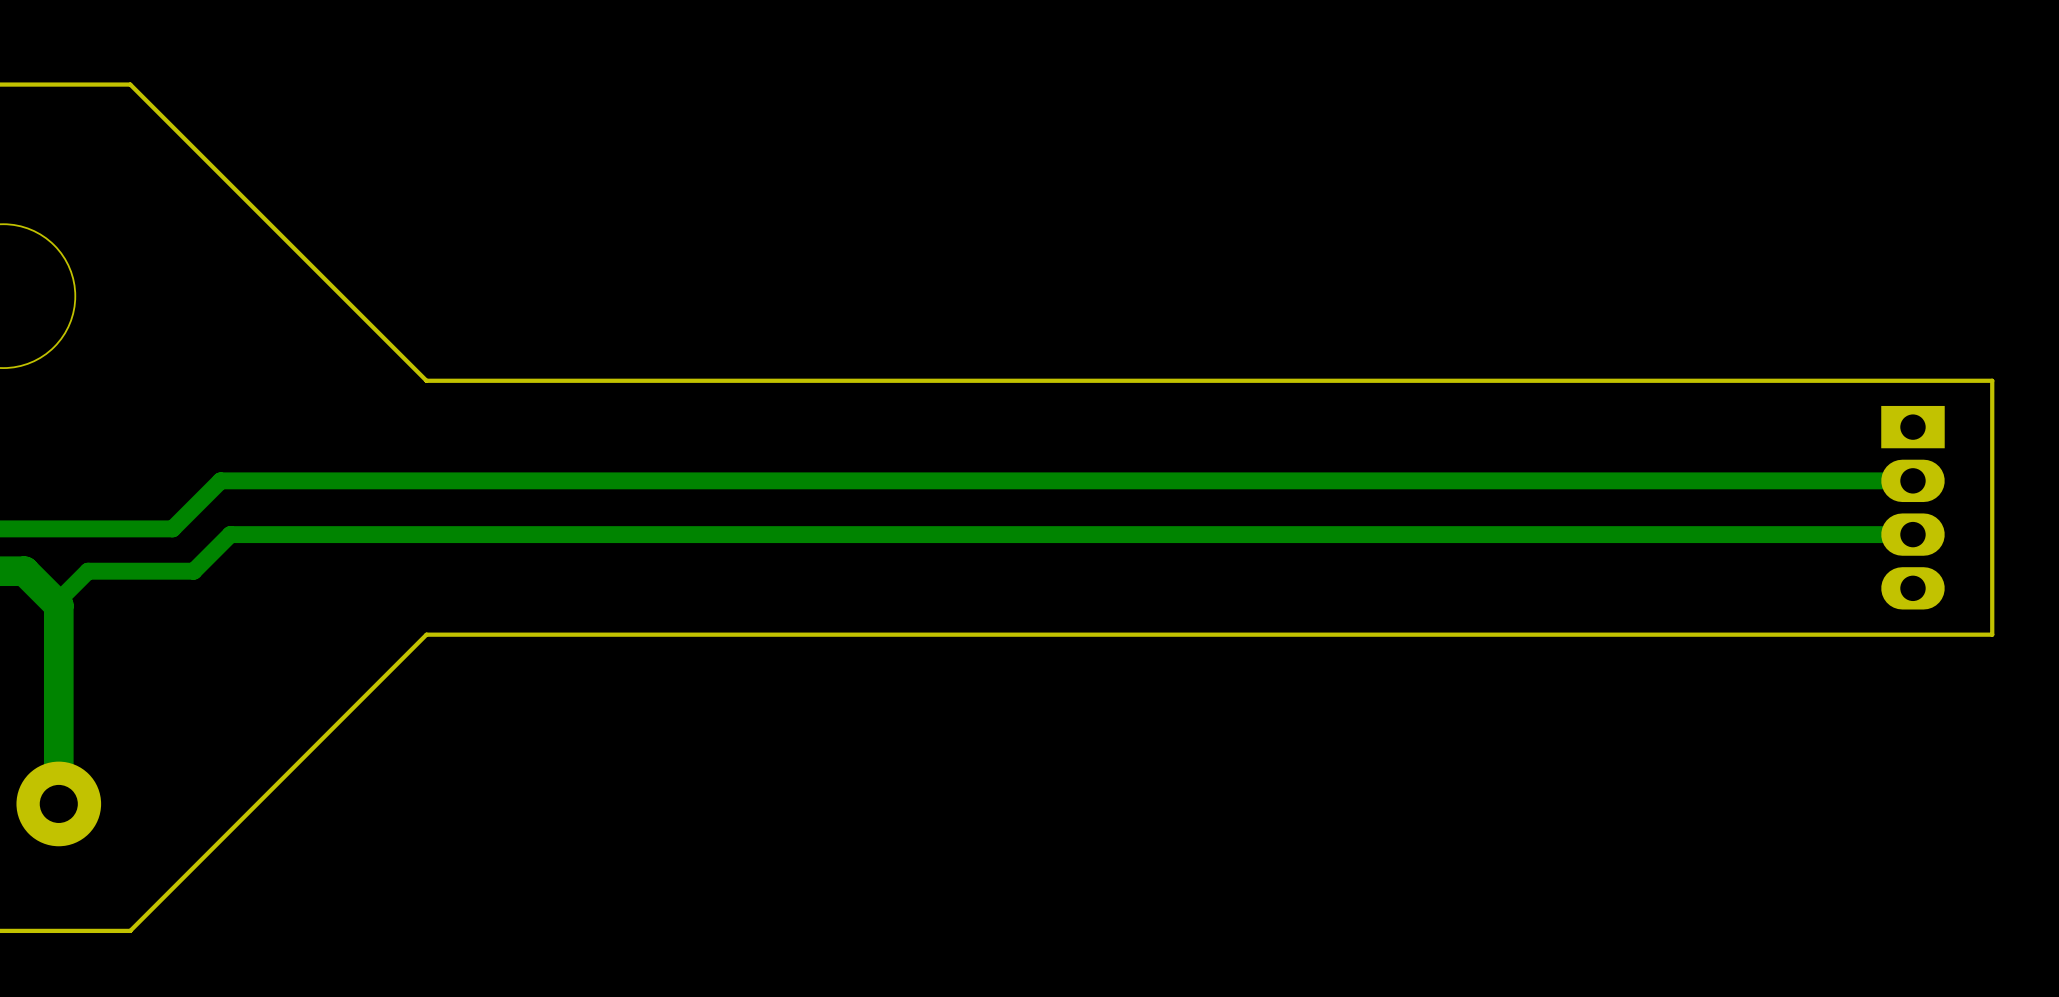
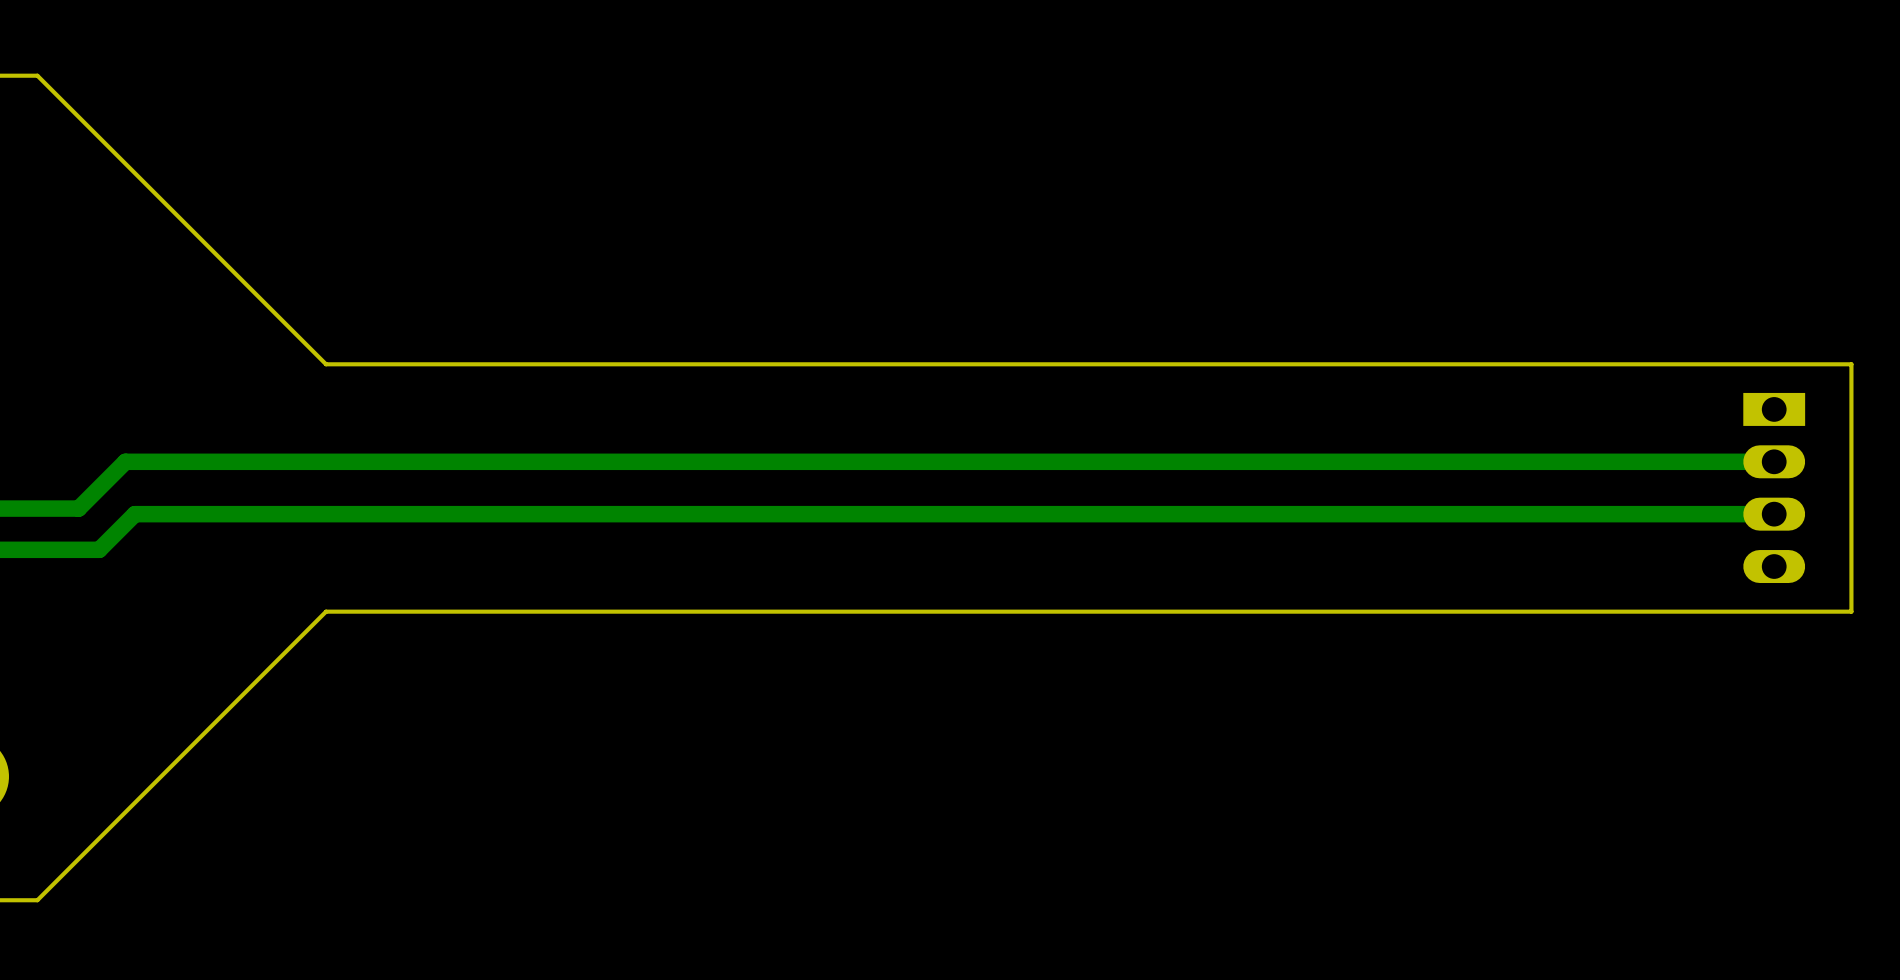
part footprint: [1881, 405, 1945, 610] -> [1743, 392, 1806, 584]

